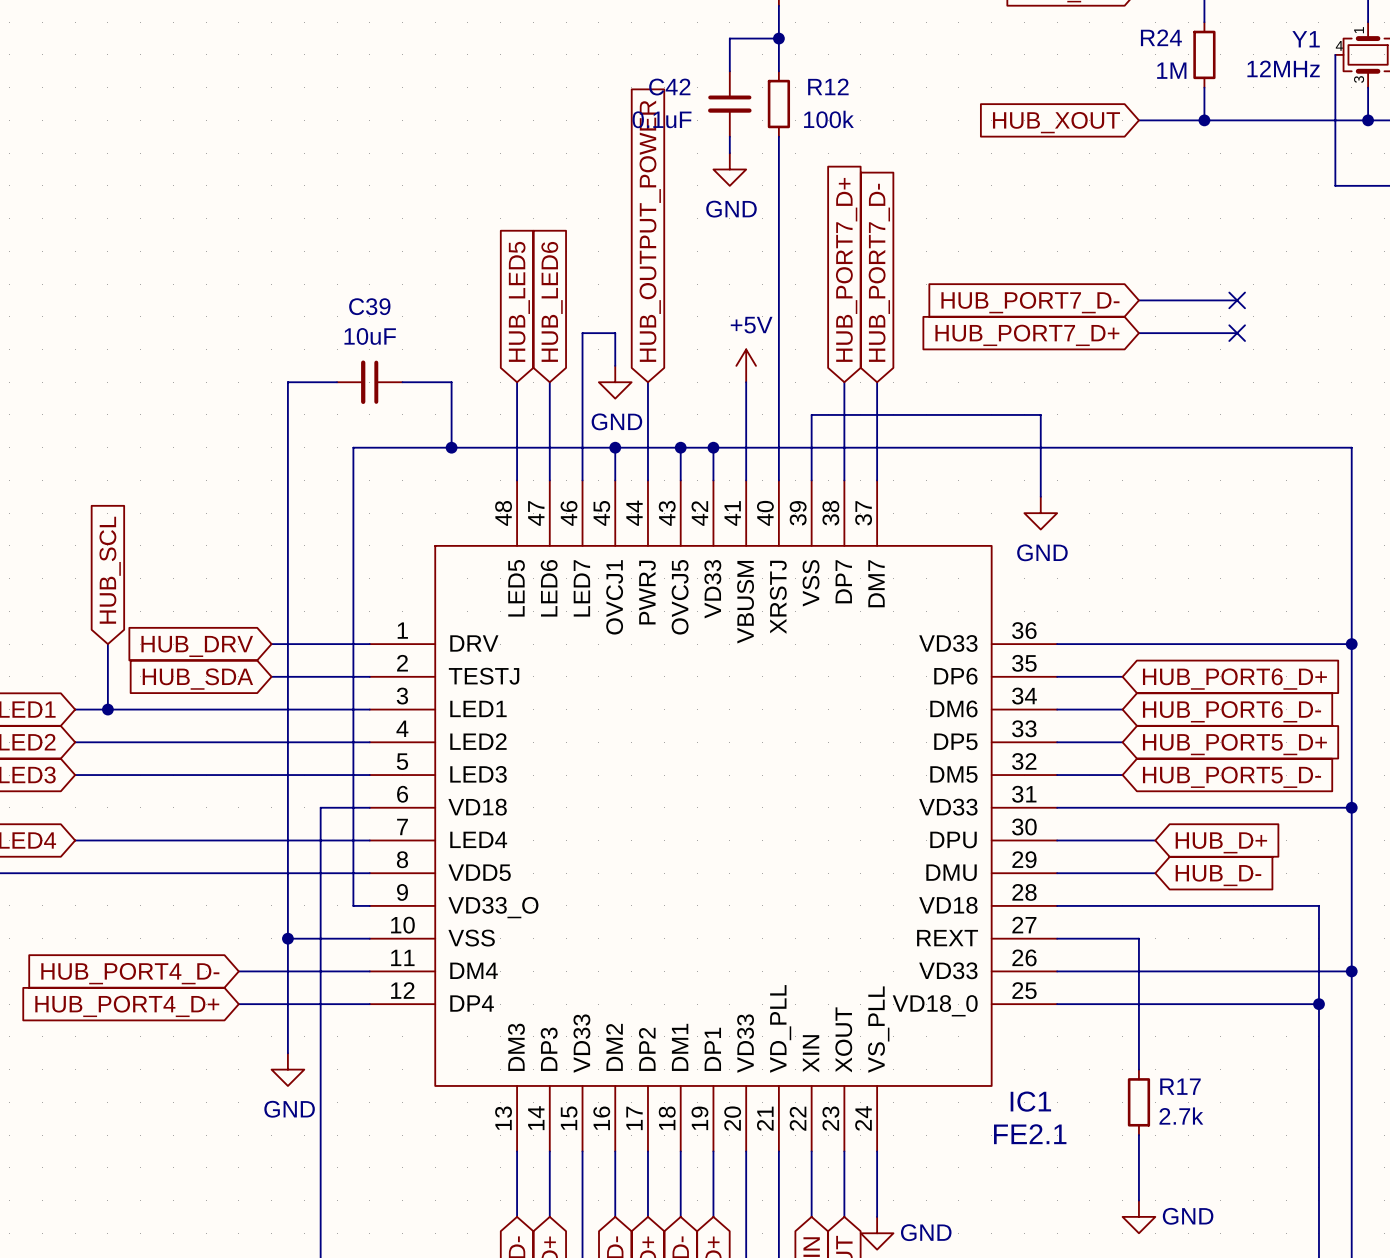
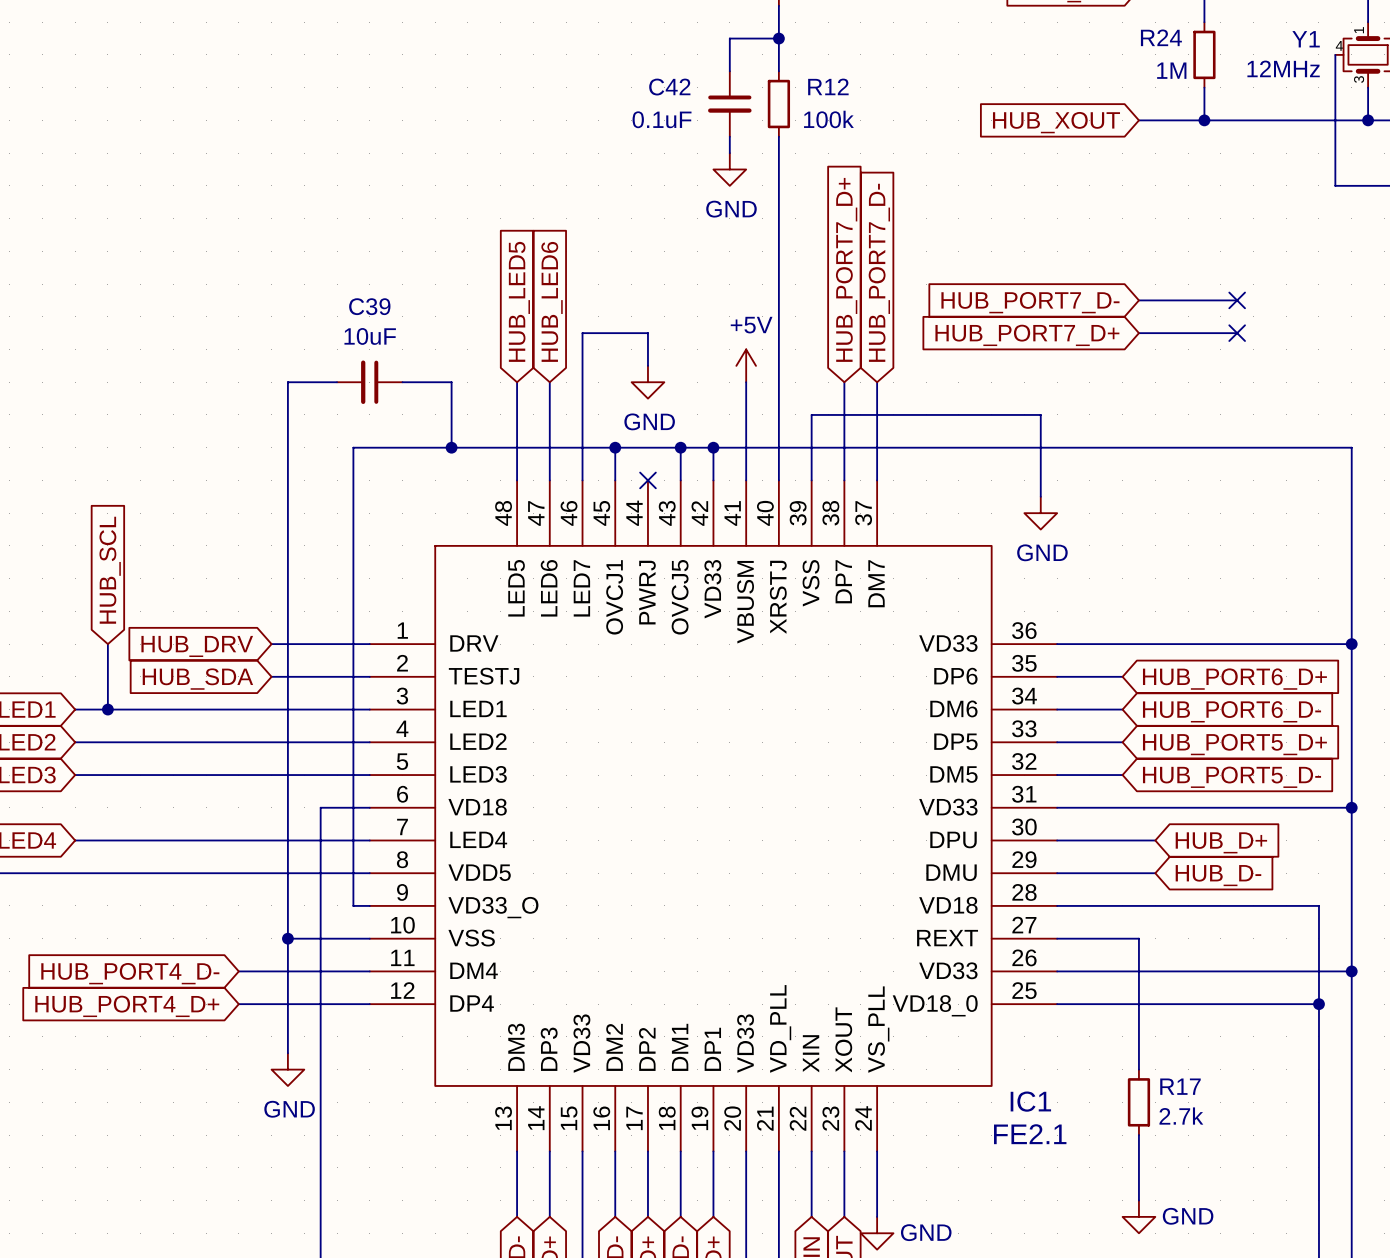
global label: HUB_OUTPUT_POWER (650, 231) -> none
wire: (615, 333) (615, 365) -> (615, 333) (647, 333) (647, 365)
power symbol position: GND (615, 382) -> GND (647, 382)
wire: (647, 382) (647, 480) -> none
no-connect mark: none -> (647, 480)

